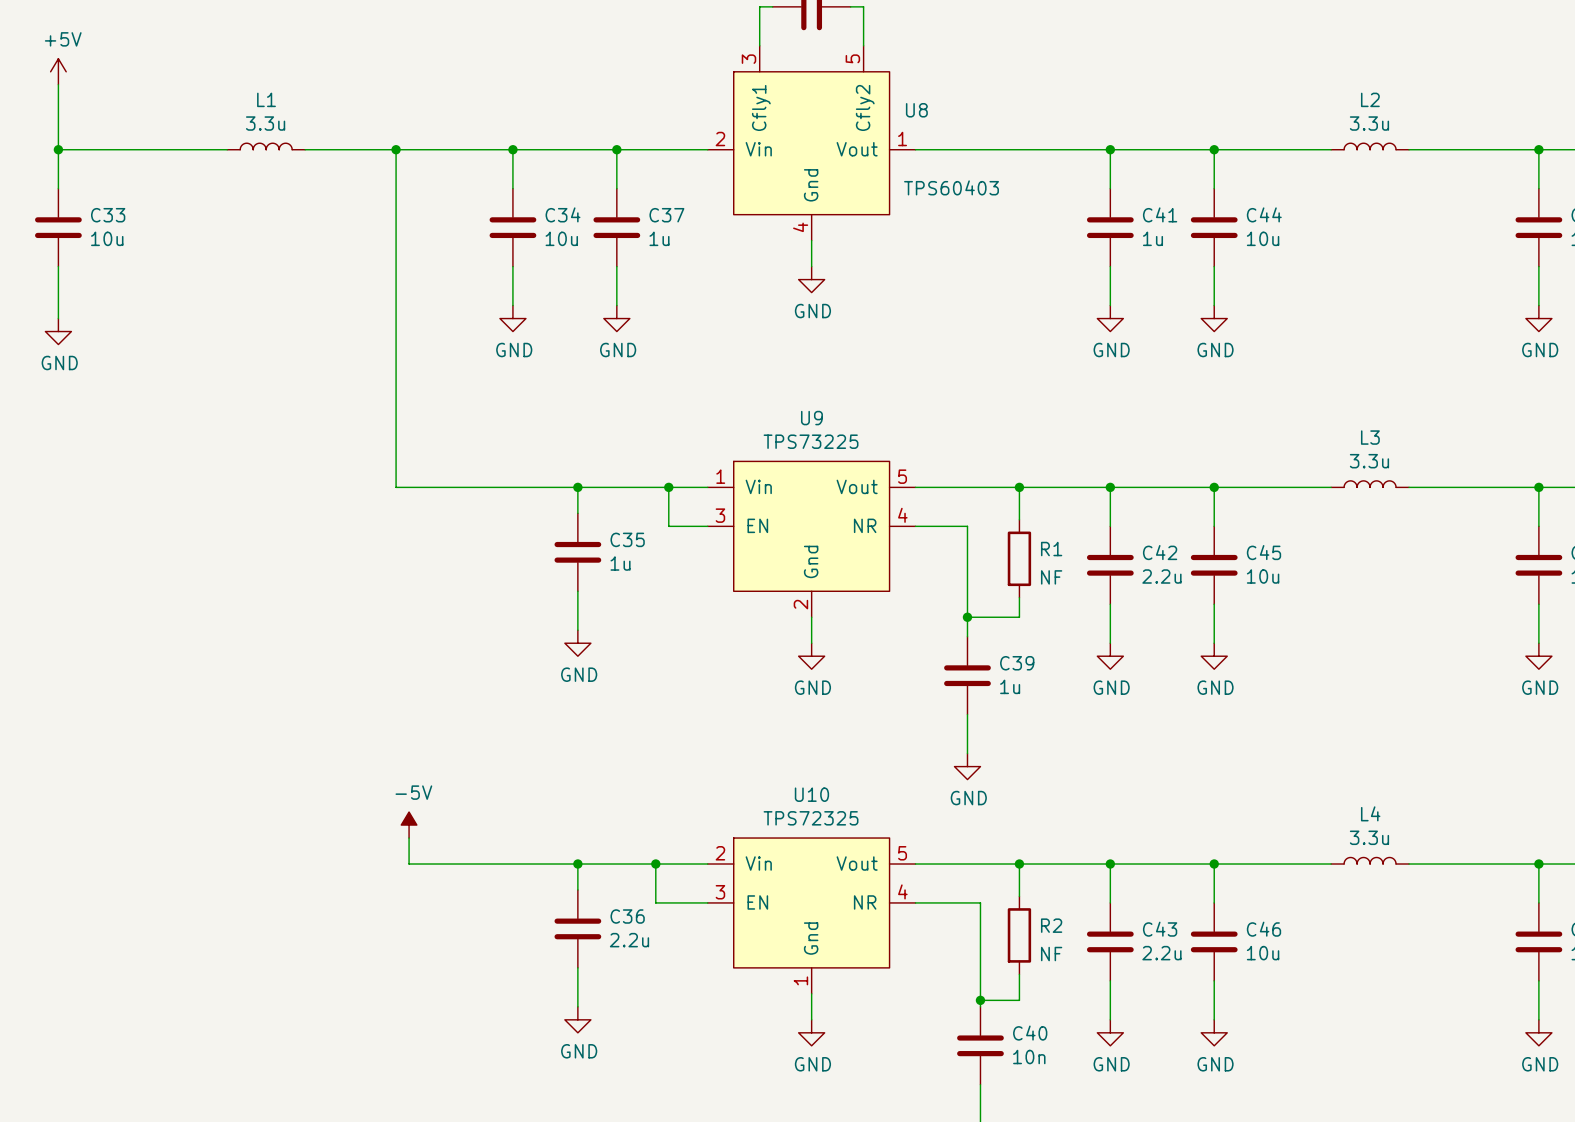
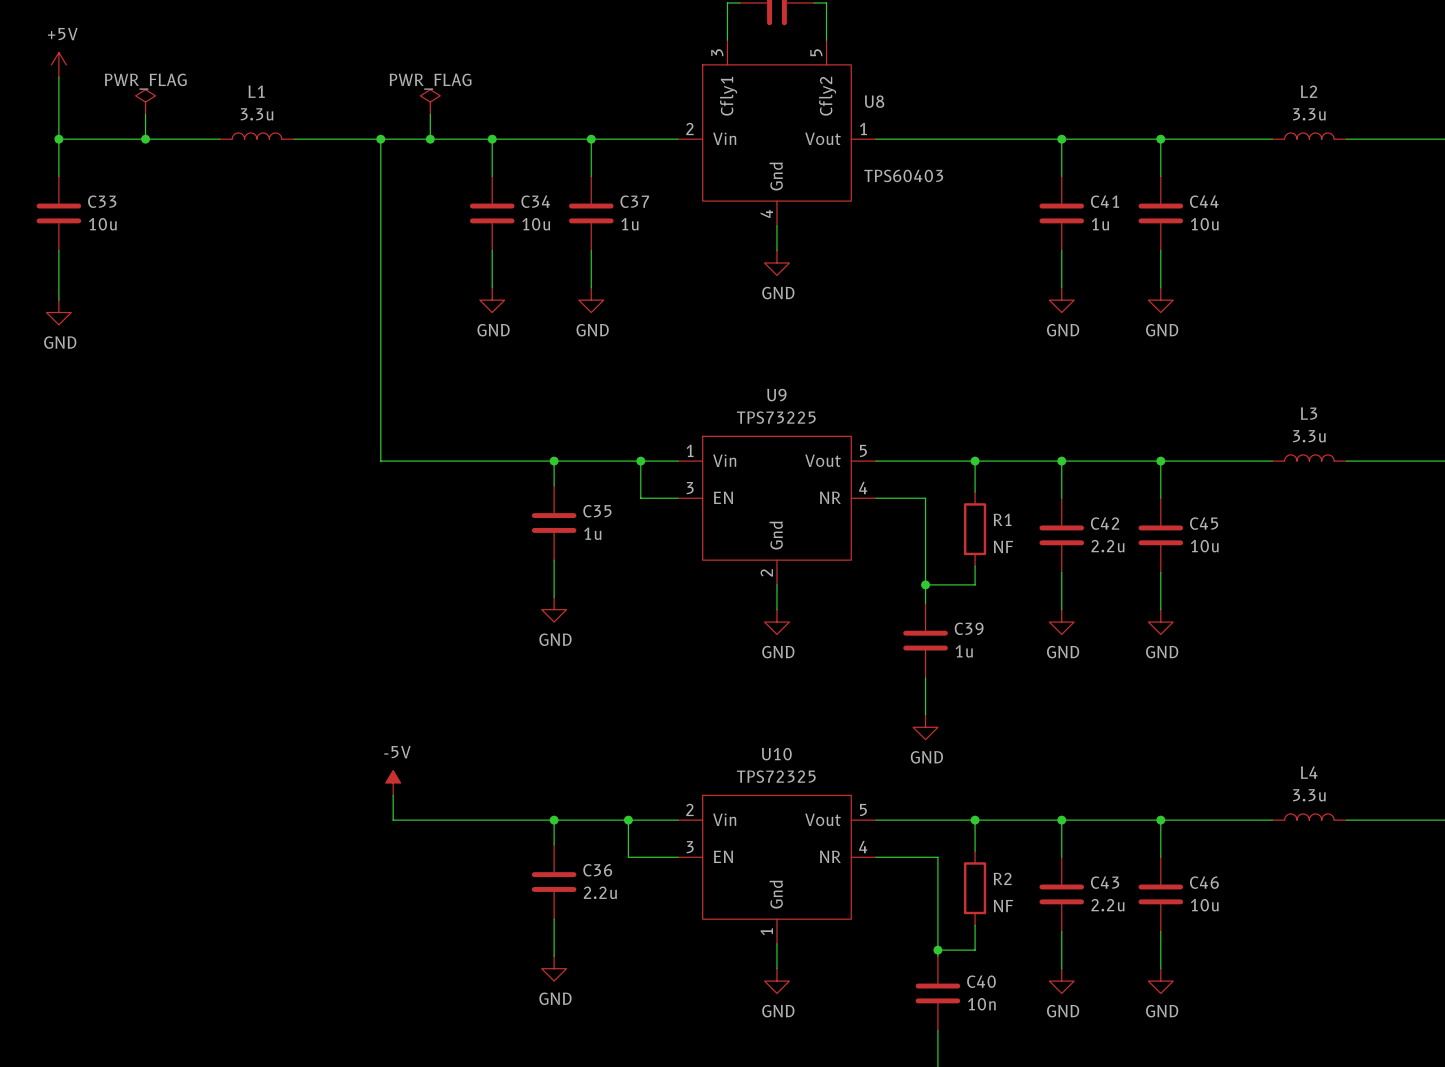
power symbol: none -> PWR_FLAG (145, 102)
power symbol: none -> PWR_FLAG (430, 102)
wire: none -> (145, 114) (145, 139)
wire: none -> (430, 114) (430, 139)
junction: none -> (145, 139)
junction: none -> (430, 139)

